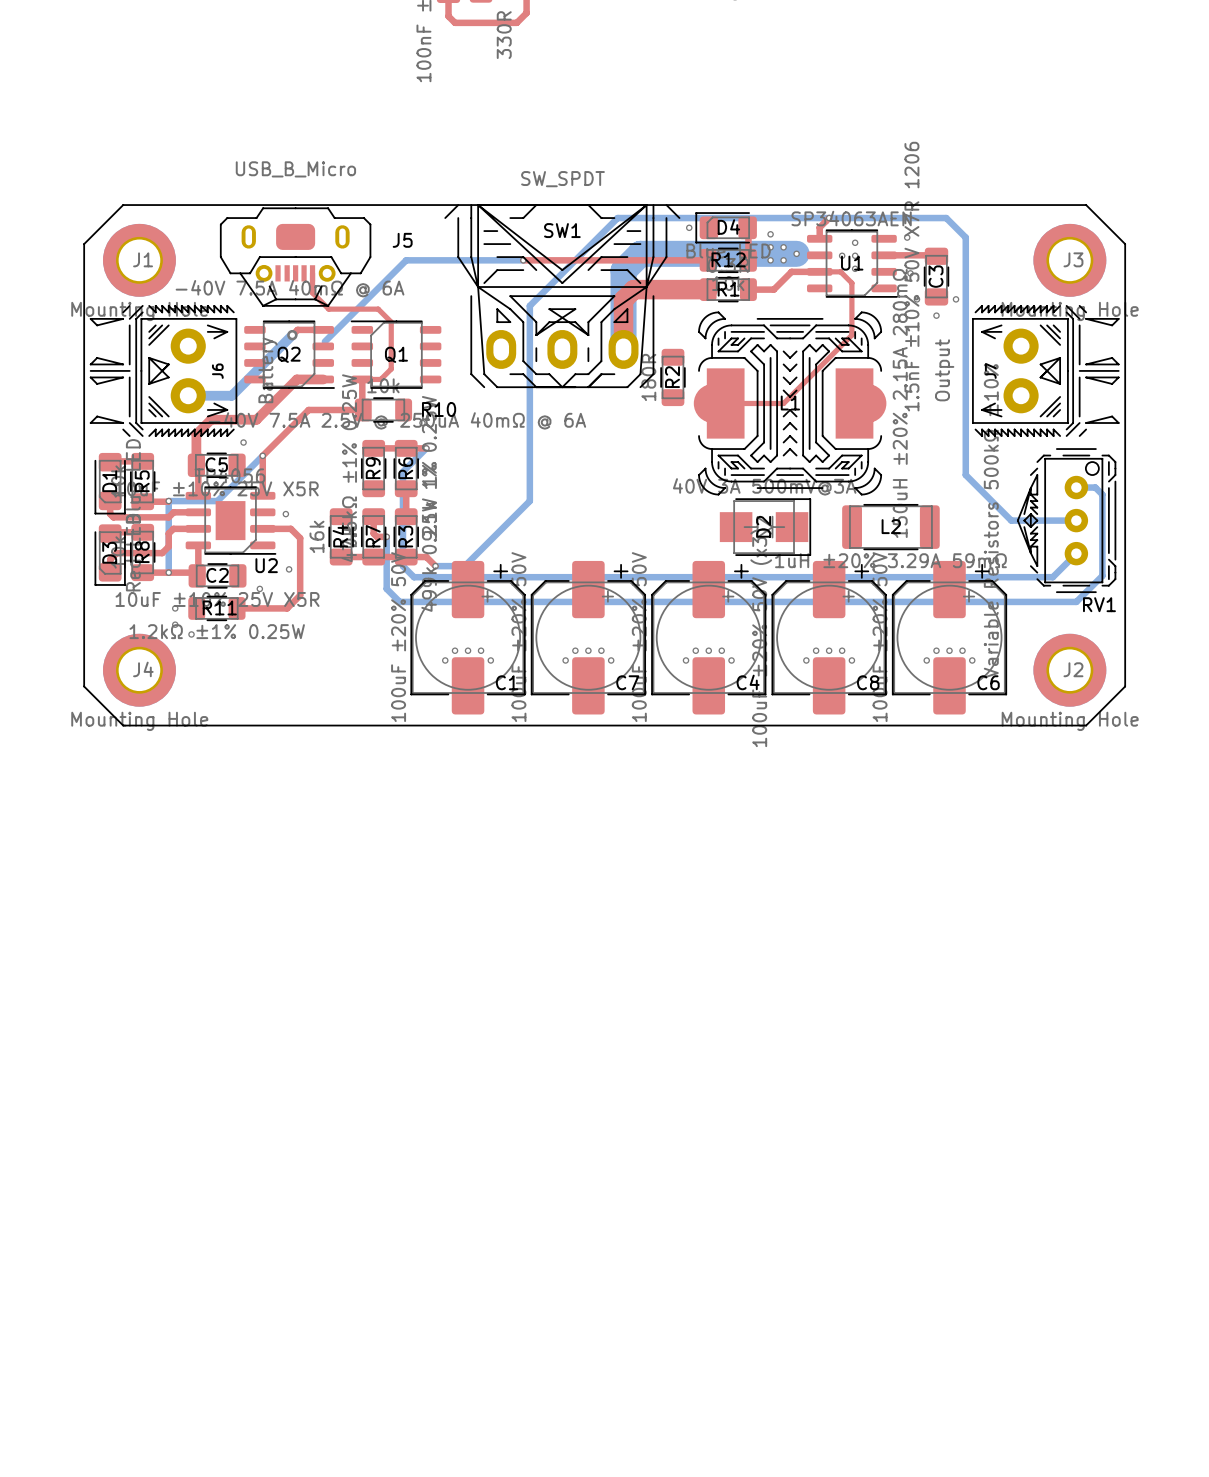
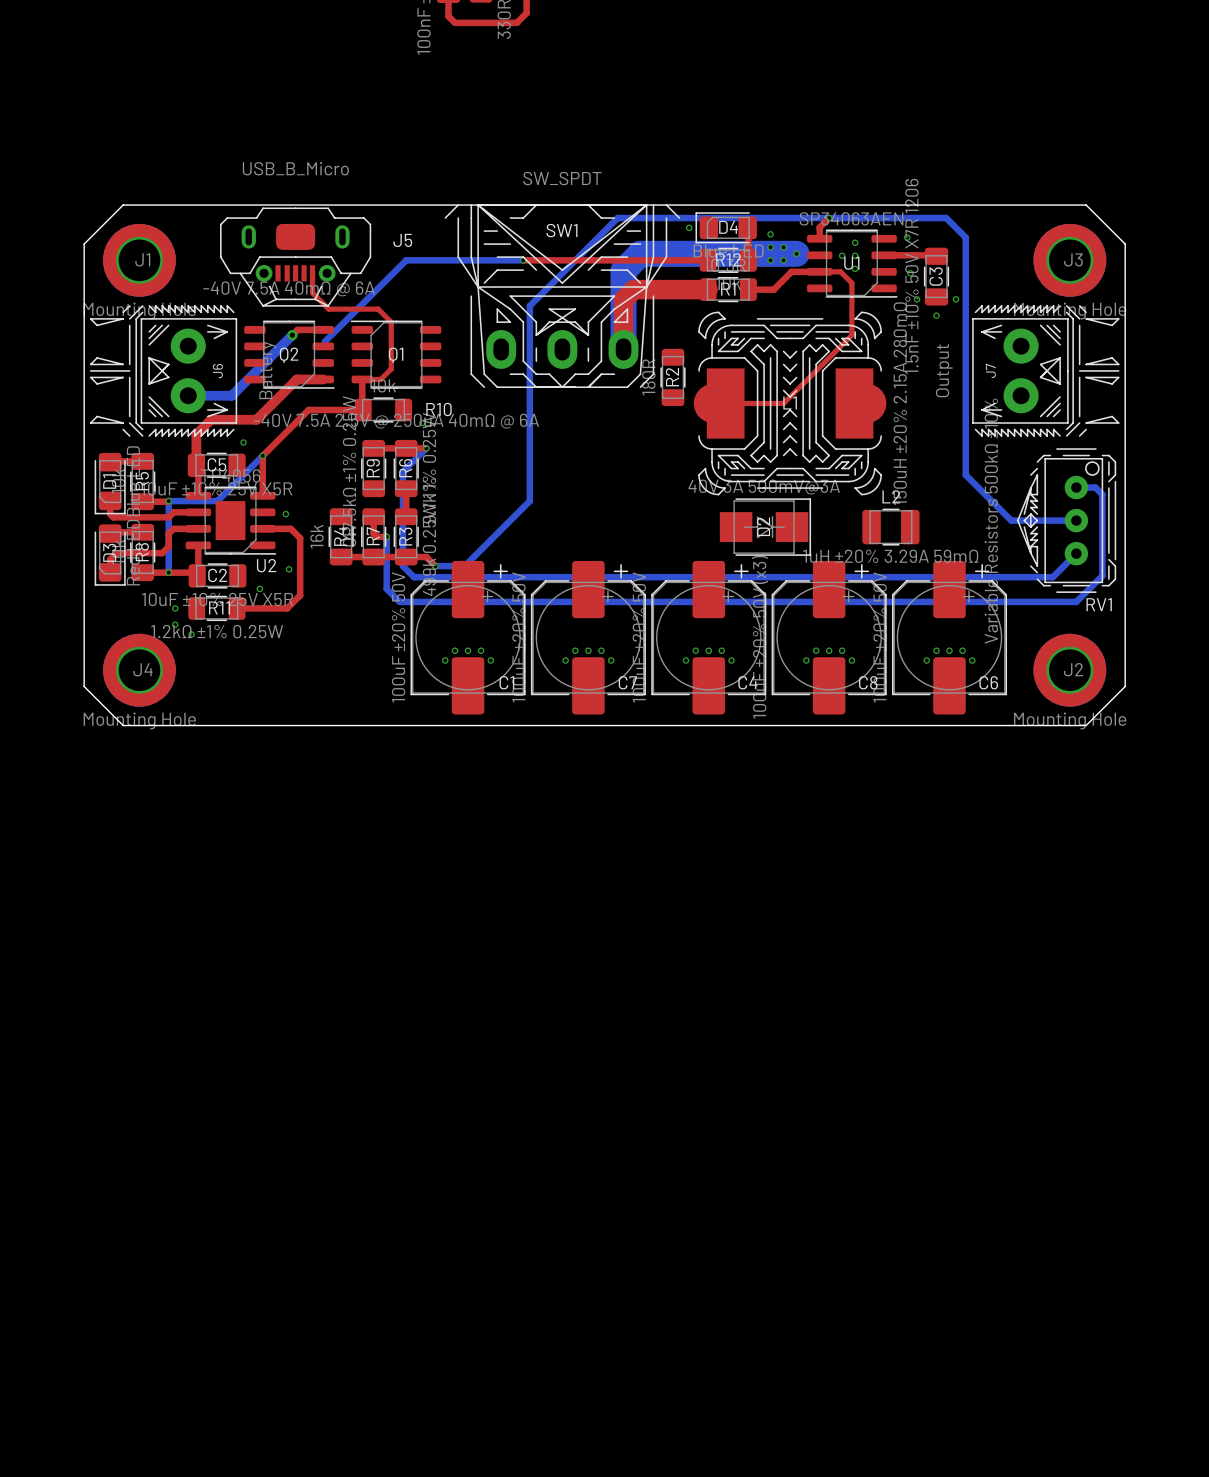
L2 footprint: [842, 504, 940, 551] -> [862, 508, 920, 546]
L2 name position: L2 (891, 526) -> L2 (891, 496)

